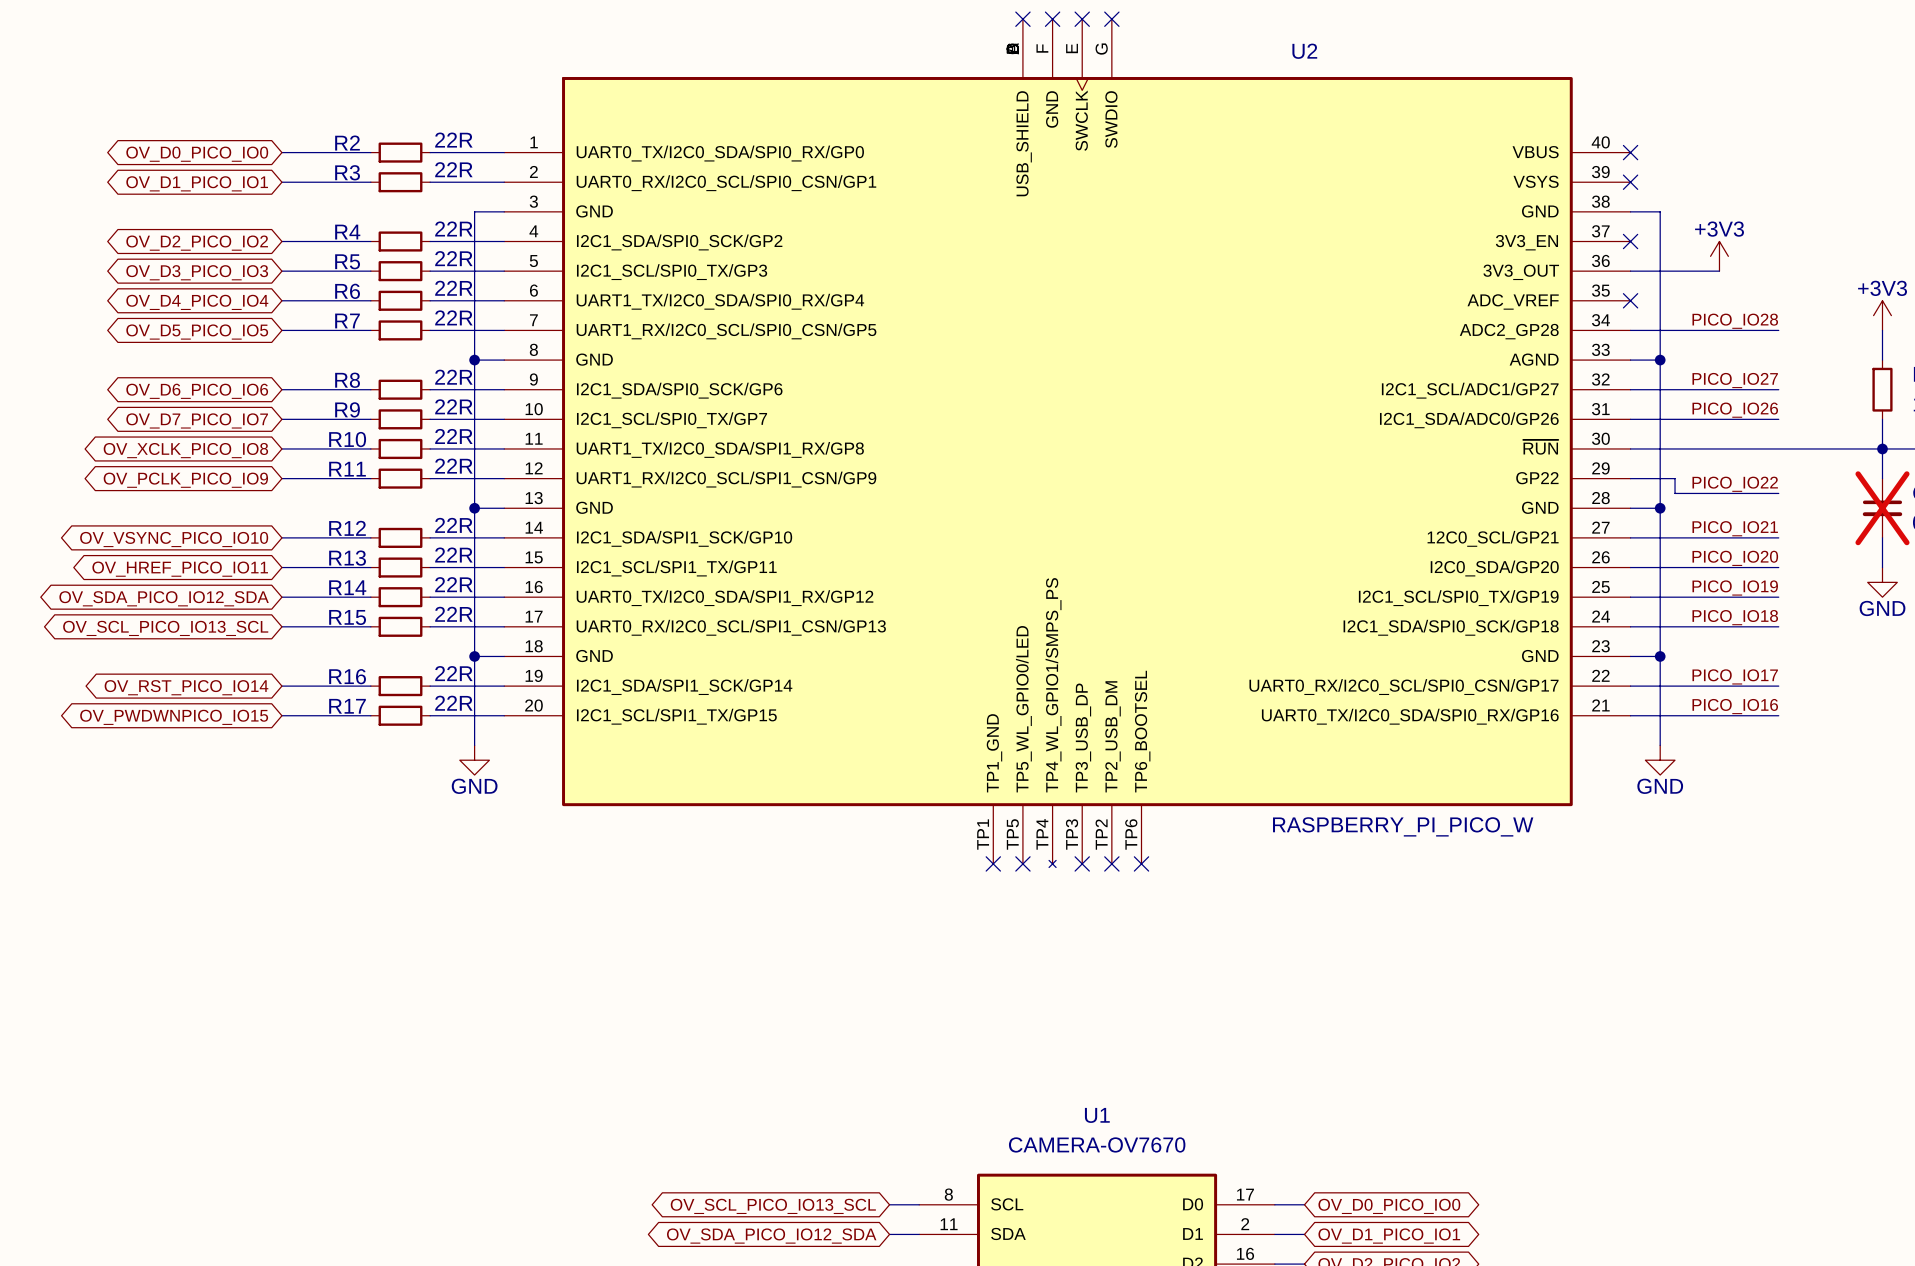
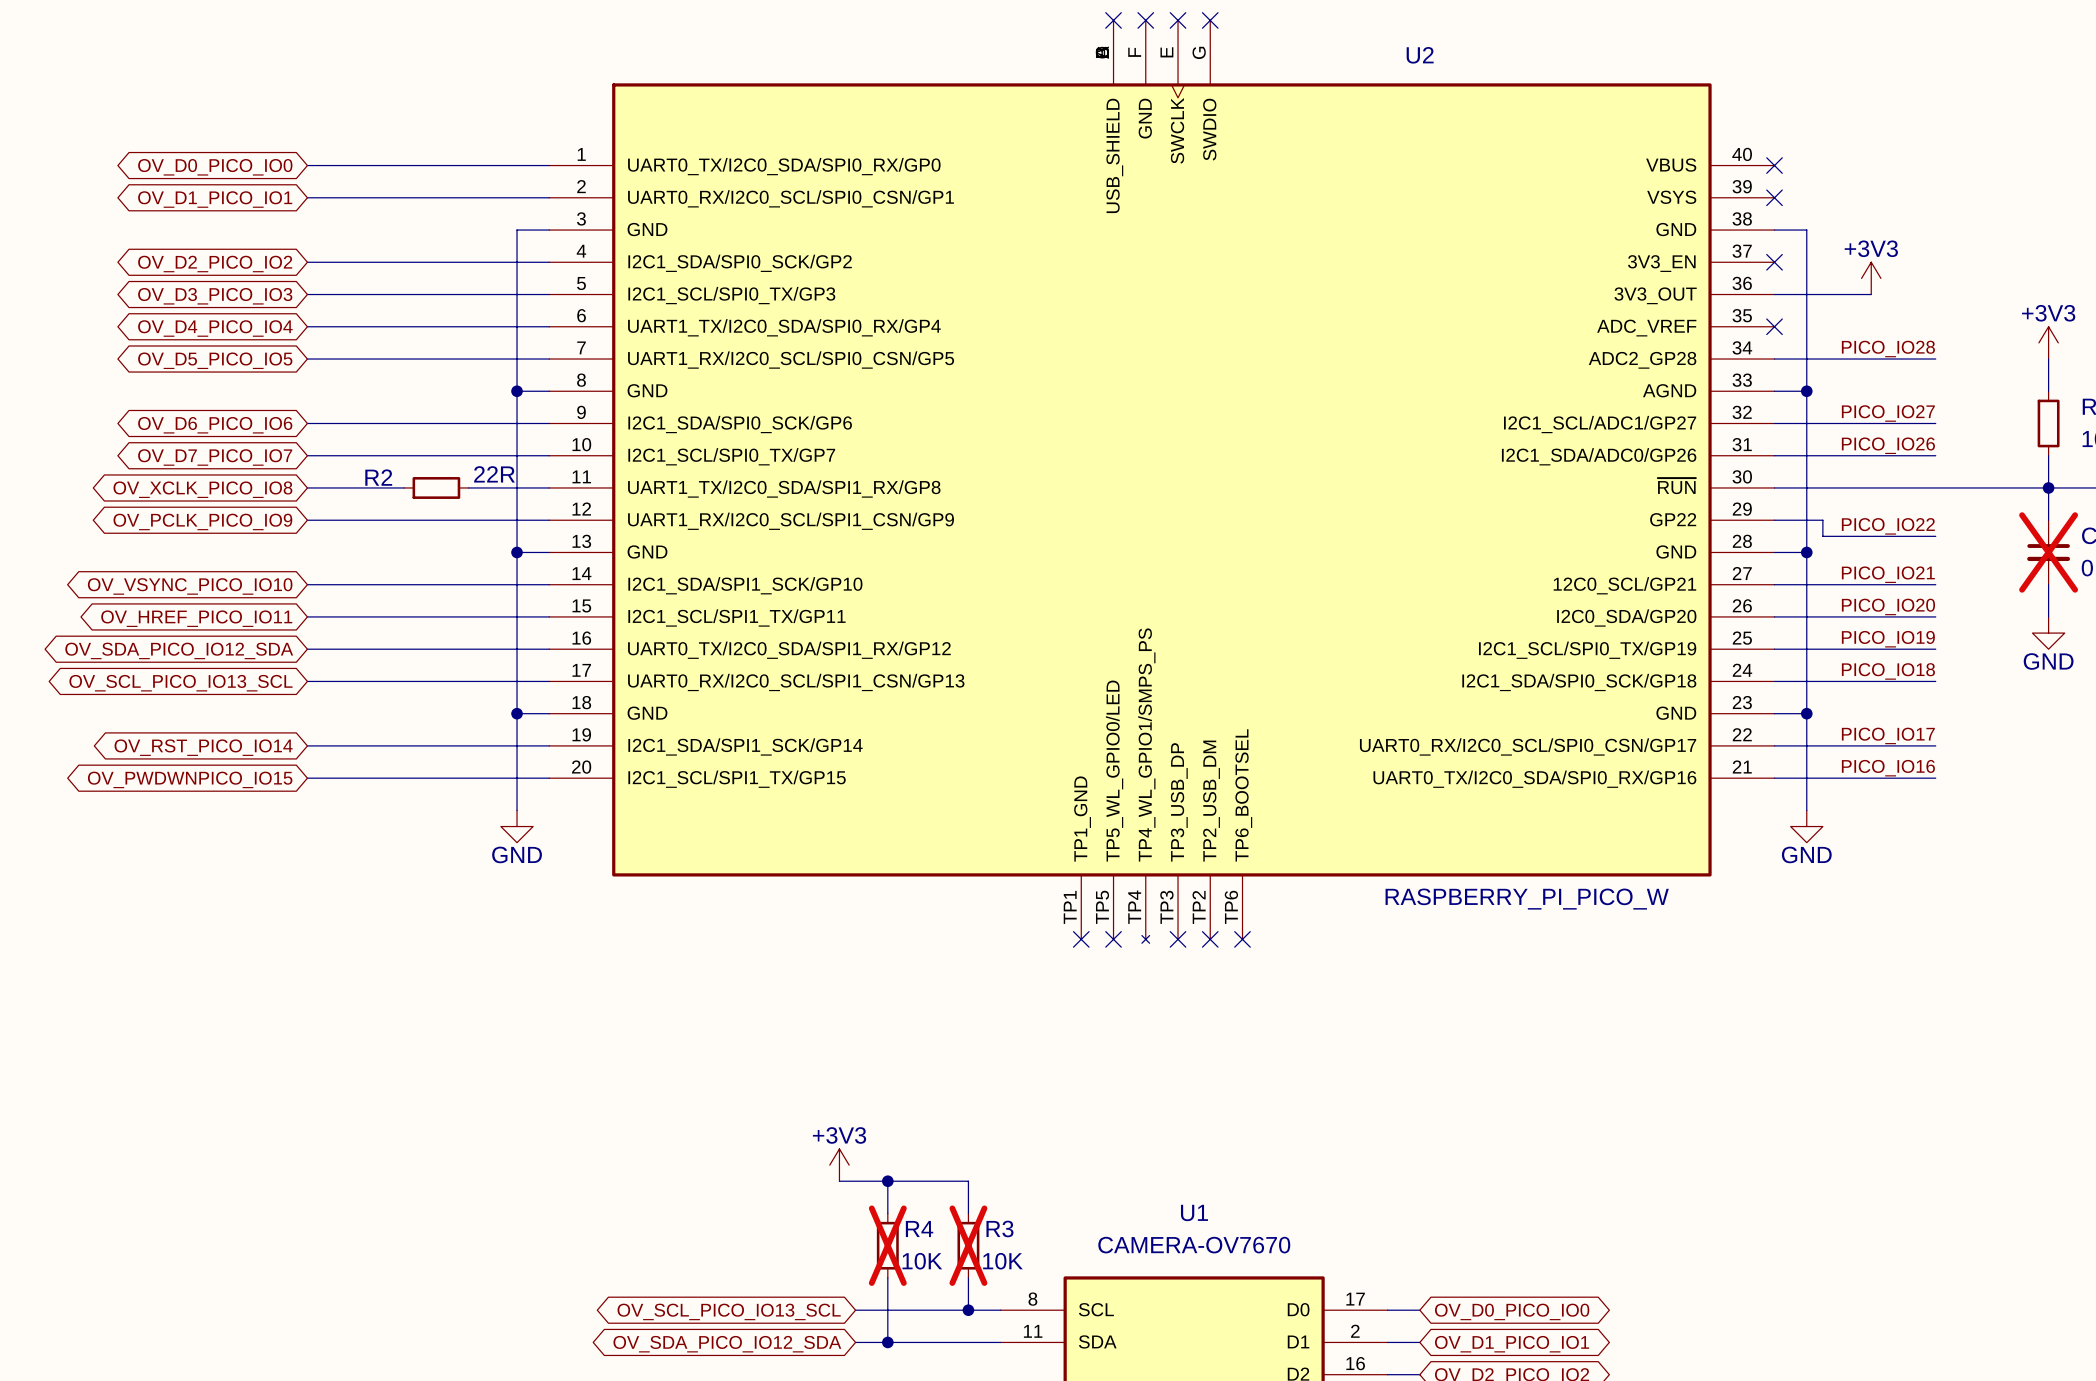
wire: none -> (404, 165) (468, 165)
R2: 22R (400, 152) -> none
R3 value: 22R (453, 169) -> 10K (1002, 1261)
R3 name position: R3 (347, 172) -> R3 (999, 1228)
wire: none -> (404, 197) (468, 197)
R3 rotation: 0° (400, 182) -> 90° clockwise (968, 1245)
R3 position: (400, 182) -> (968, 1245)
R4 value: 22R (453, 228) -> 10K (922, 1261)
R4 name position: R4 (347, 232) -> R4 (919, 1228)
wire: none -> (404, 262) (468, 262)
R4 rotation: 0° (400, 241) -> 90° clockwise (887, 1245)
R4 position: (400, 241) -> (887, 1245)
wire: none -> (404, 294) (468, 294)
R5: 22R (400, 271) -> none
wire: none -> (404, 326) (468, 326)
R6: 22R (400, 300) -> none
wire: none -> (404, 359) (468, 359)
R7: 22R (400, 330) -> none
wire: none -> (404, 423) (468, 423)
R8: 22R (400, 389) -> none
wire: none -> (404, 455) (468, 455)
R9: 22R (400, 419) -> none
R10 name: R10 (347, 439) -> R2 (378, 477)
wire: none -> (404, 520) (468, 520)
R11: 22R (400, 478) -> none
wire: none -> (404, 584) (468, 584)
R12: 22R (400, 537) -> none
wire: none -> (404, 616) (468, 616)
R13: 22R (400, 567) -> none
wire: none -> (404, 649) (468, 649)
R14: 22R (400, 597) -> none
wire: none -> (404, 681) (468, 681)
R15: 22R (400, 626) -> none
wire: none -> (404, 745) (468, 745)
R16: 22R (400, 686) -> none
wire: none -> (404, 778) (468, 778)
R17: 22R (400, 715) -> none
power symbol: none -> +3V3 (839, 1165)
wire: none -> (839, 1181) (968, 1181) (968, 1213)
wire: none -> (887, 1181) (887, 1213)
junction: none -> (887, 1181)
R4 do-not-place cross: none -> (887, 1245)
R3 do-not-place cross: none -> (968, 1245)
wire: none -> (887, 1277) (887, 1342)
wire: none -> (968, 1277) (968, 1310) (855, 1310)
junction: none -> (968, 1310)
global label position: OV_SCL_PICO_IO13_SCL (773, 1206) -> OV_SCL_PICO_IO13_SCL (729, 1311)
wire: none -> (855, 1342) (968, 1342)
junction: none -> (887, 1342)
global label position: OV_SDA_PICO_IO12_SDA (771, 1236) -> OV_SDA_PICO_IO12_SDA (727, 1344)

